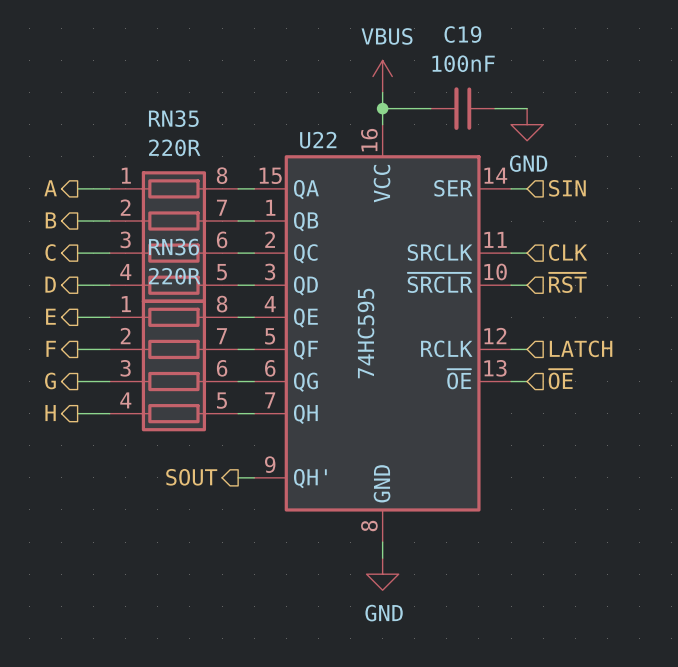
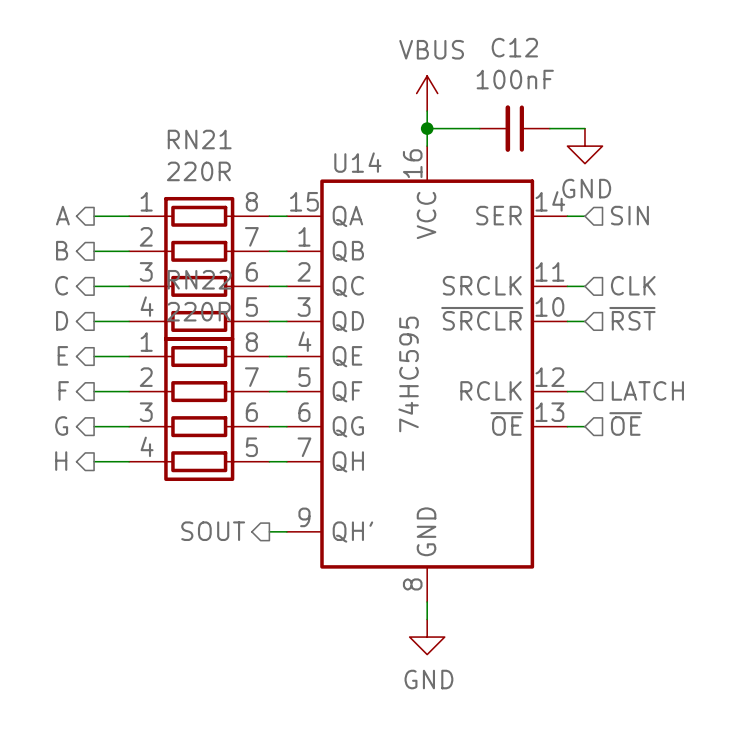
C19 name: C19 (462, 34) -> C12 (514, 47)
RN35 name: RN35 (173, 118) -> RN21 (199, 139)
U22 name: U22 (318, 140) -> U14 (357, 162)
RN36 name: RN36 (173, 247) -> RN22 (199, 279)

